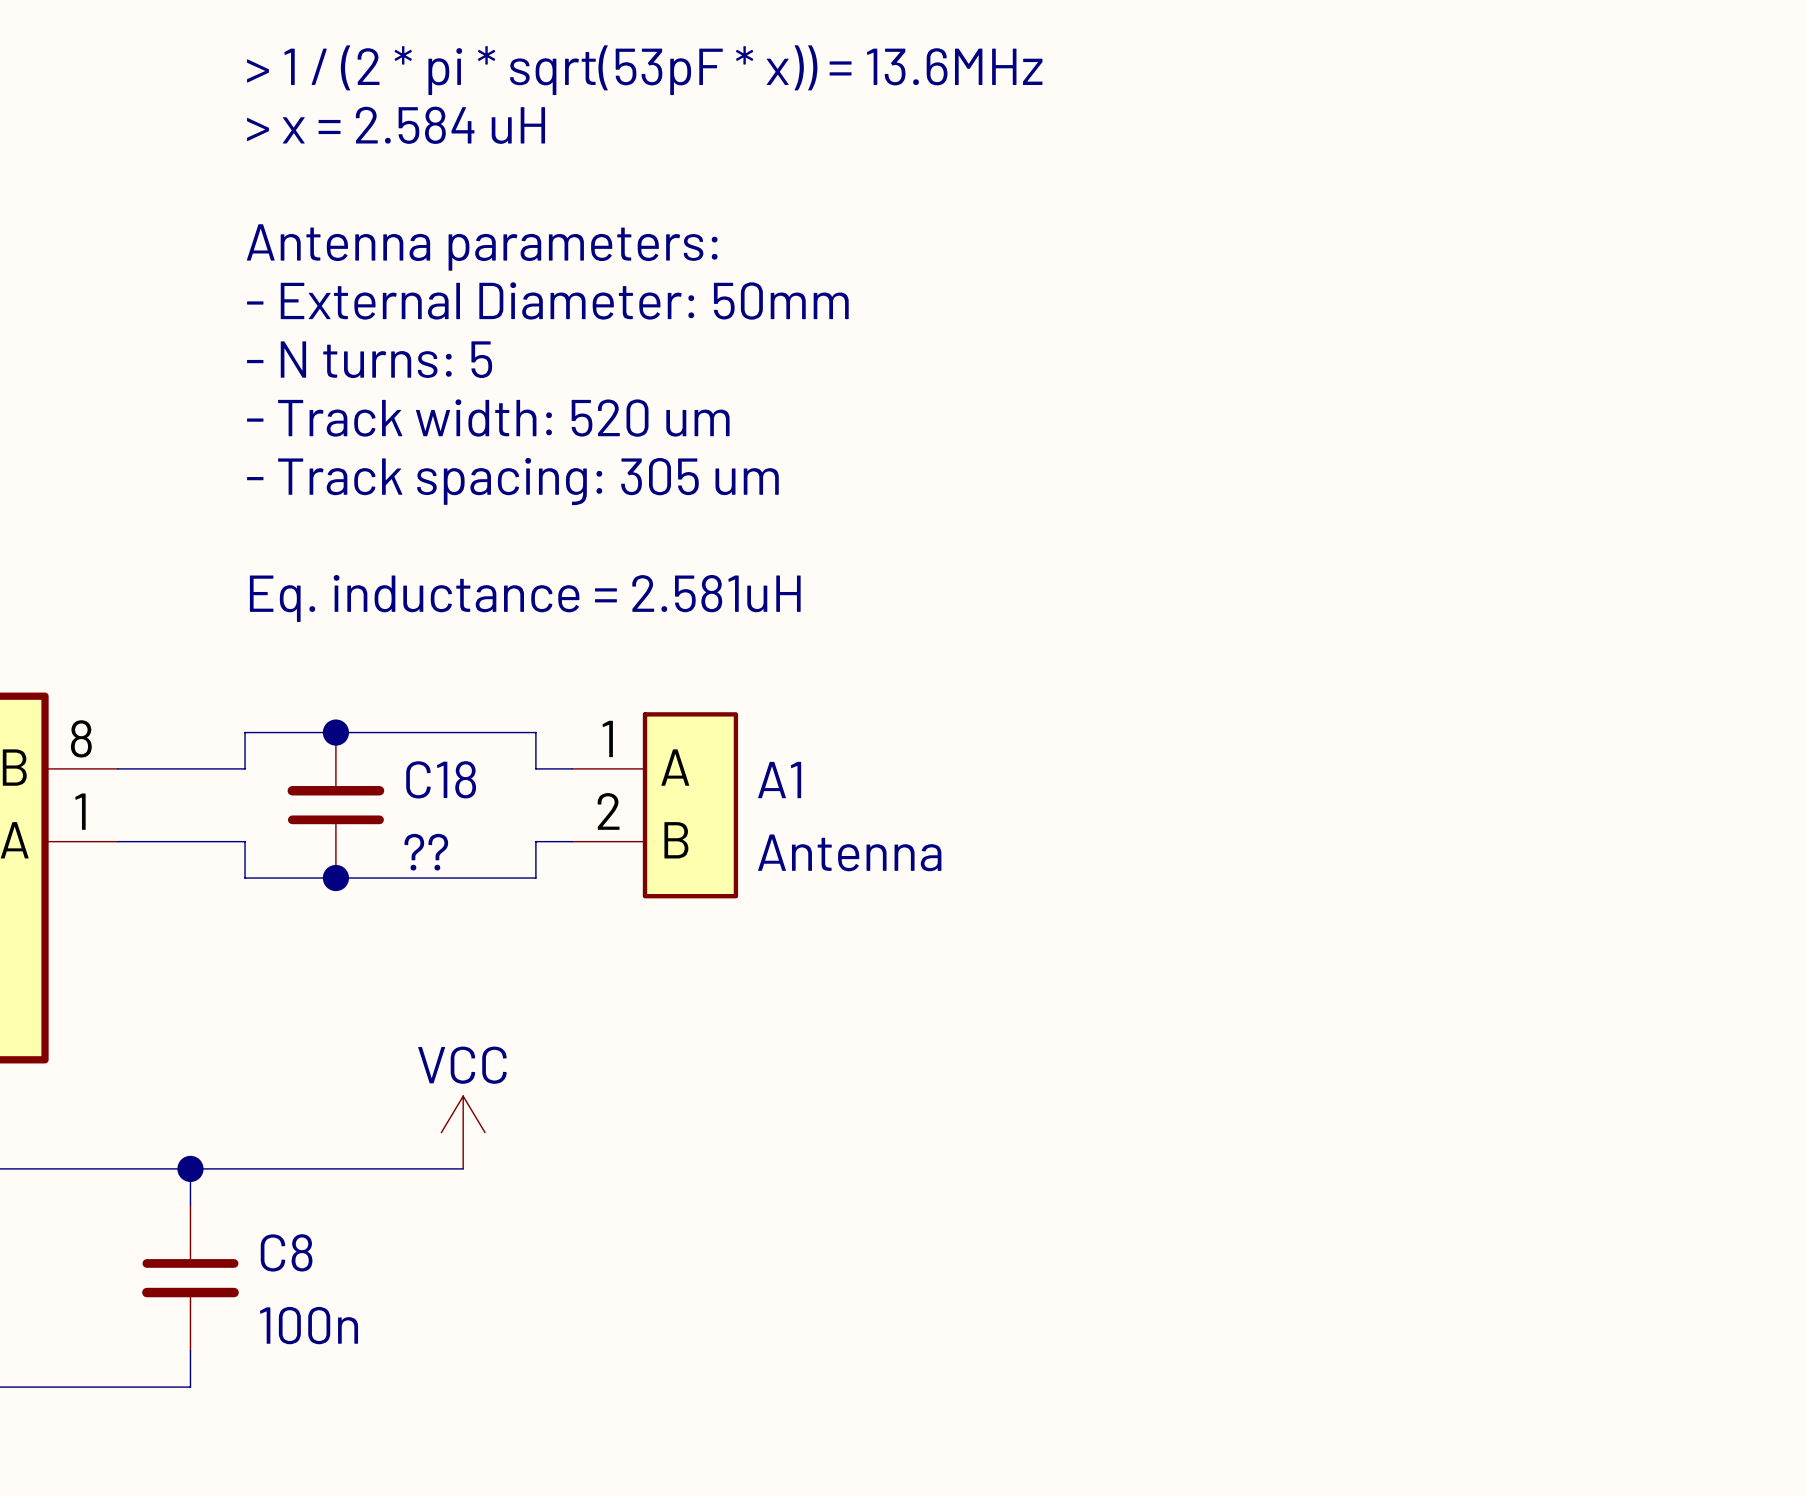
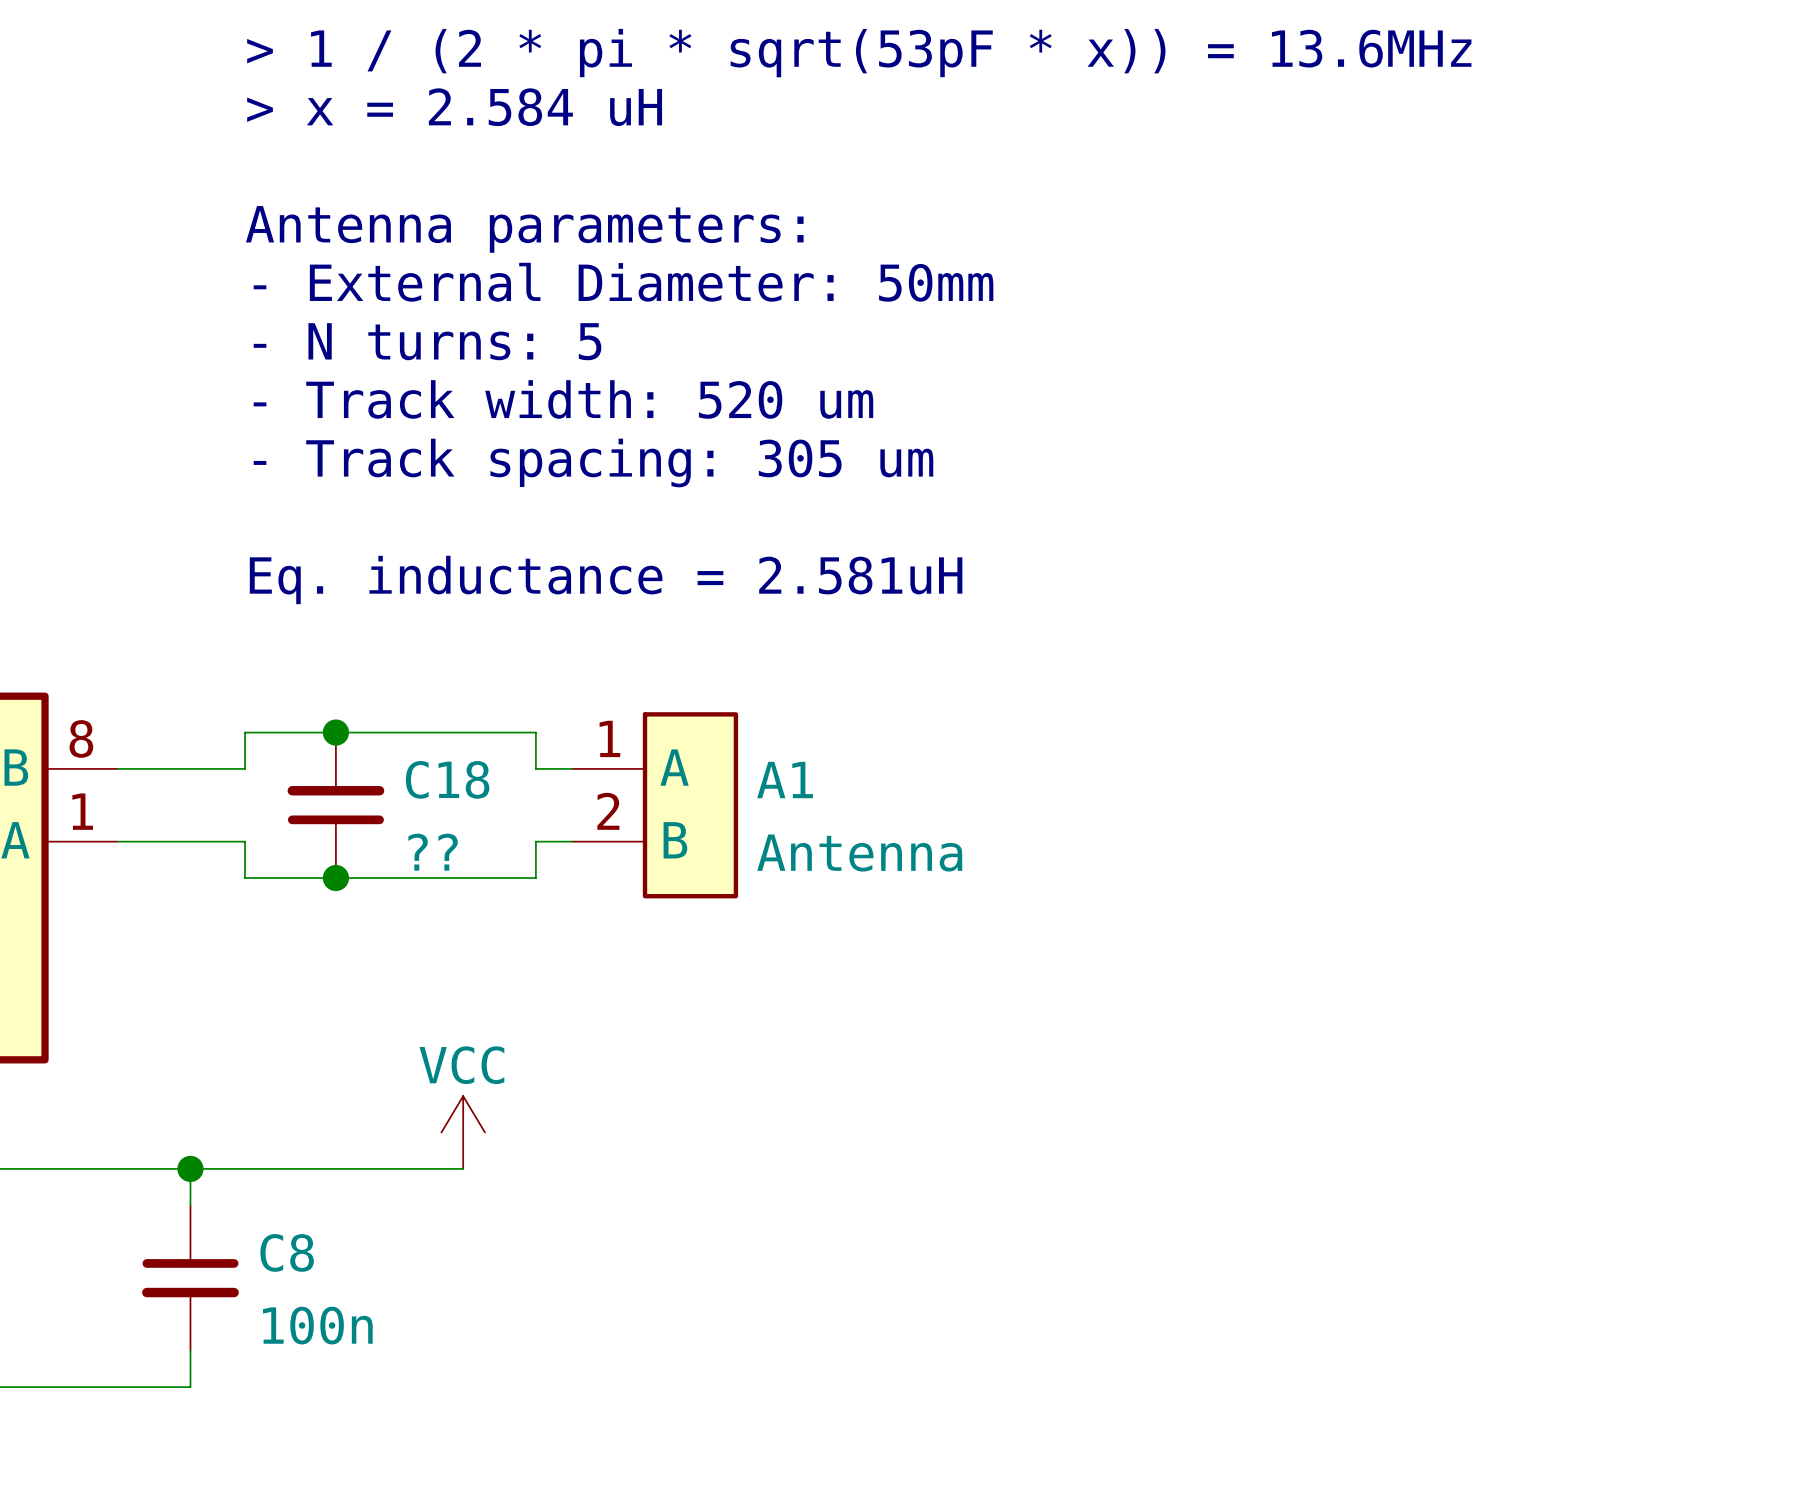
text position: > 1 / (2 * pi * sqrt(53pF * x)) = 13.6MHz (644, 70) -> > 1 / (2 * pi * sqrt(53pF * x)) = 13.6MHz (859, 53)
text position: > x = 2.584 uH (396, 125) -> > x = 2.584 uH (454, 107)
text position: Antenna parameters: (482, 247) -> Antenna parameters: (524, 229)
text position: - External Diameter: 50mm (547, 300) -> - External Diameter: 50mm (623, 282)
text position: - N turns: 5 (369, 359) -> - N turns: 5 (427, 341)
text position: - Track width: 520 um (488, 418) -> - Track width: 520 um (563, 399)
text position: - Track spacing: 305 um (512, 481) -> - Track spacing: 305 um (593, 463)
text position: Eq. inductance = 2.581uH (525, 598) -> Eq. inductance = 2.581uH (606, 579)

